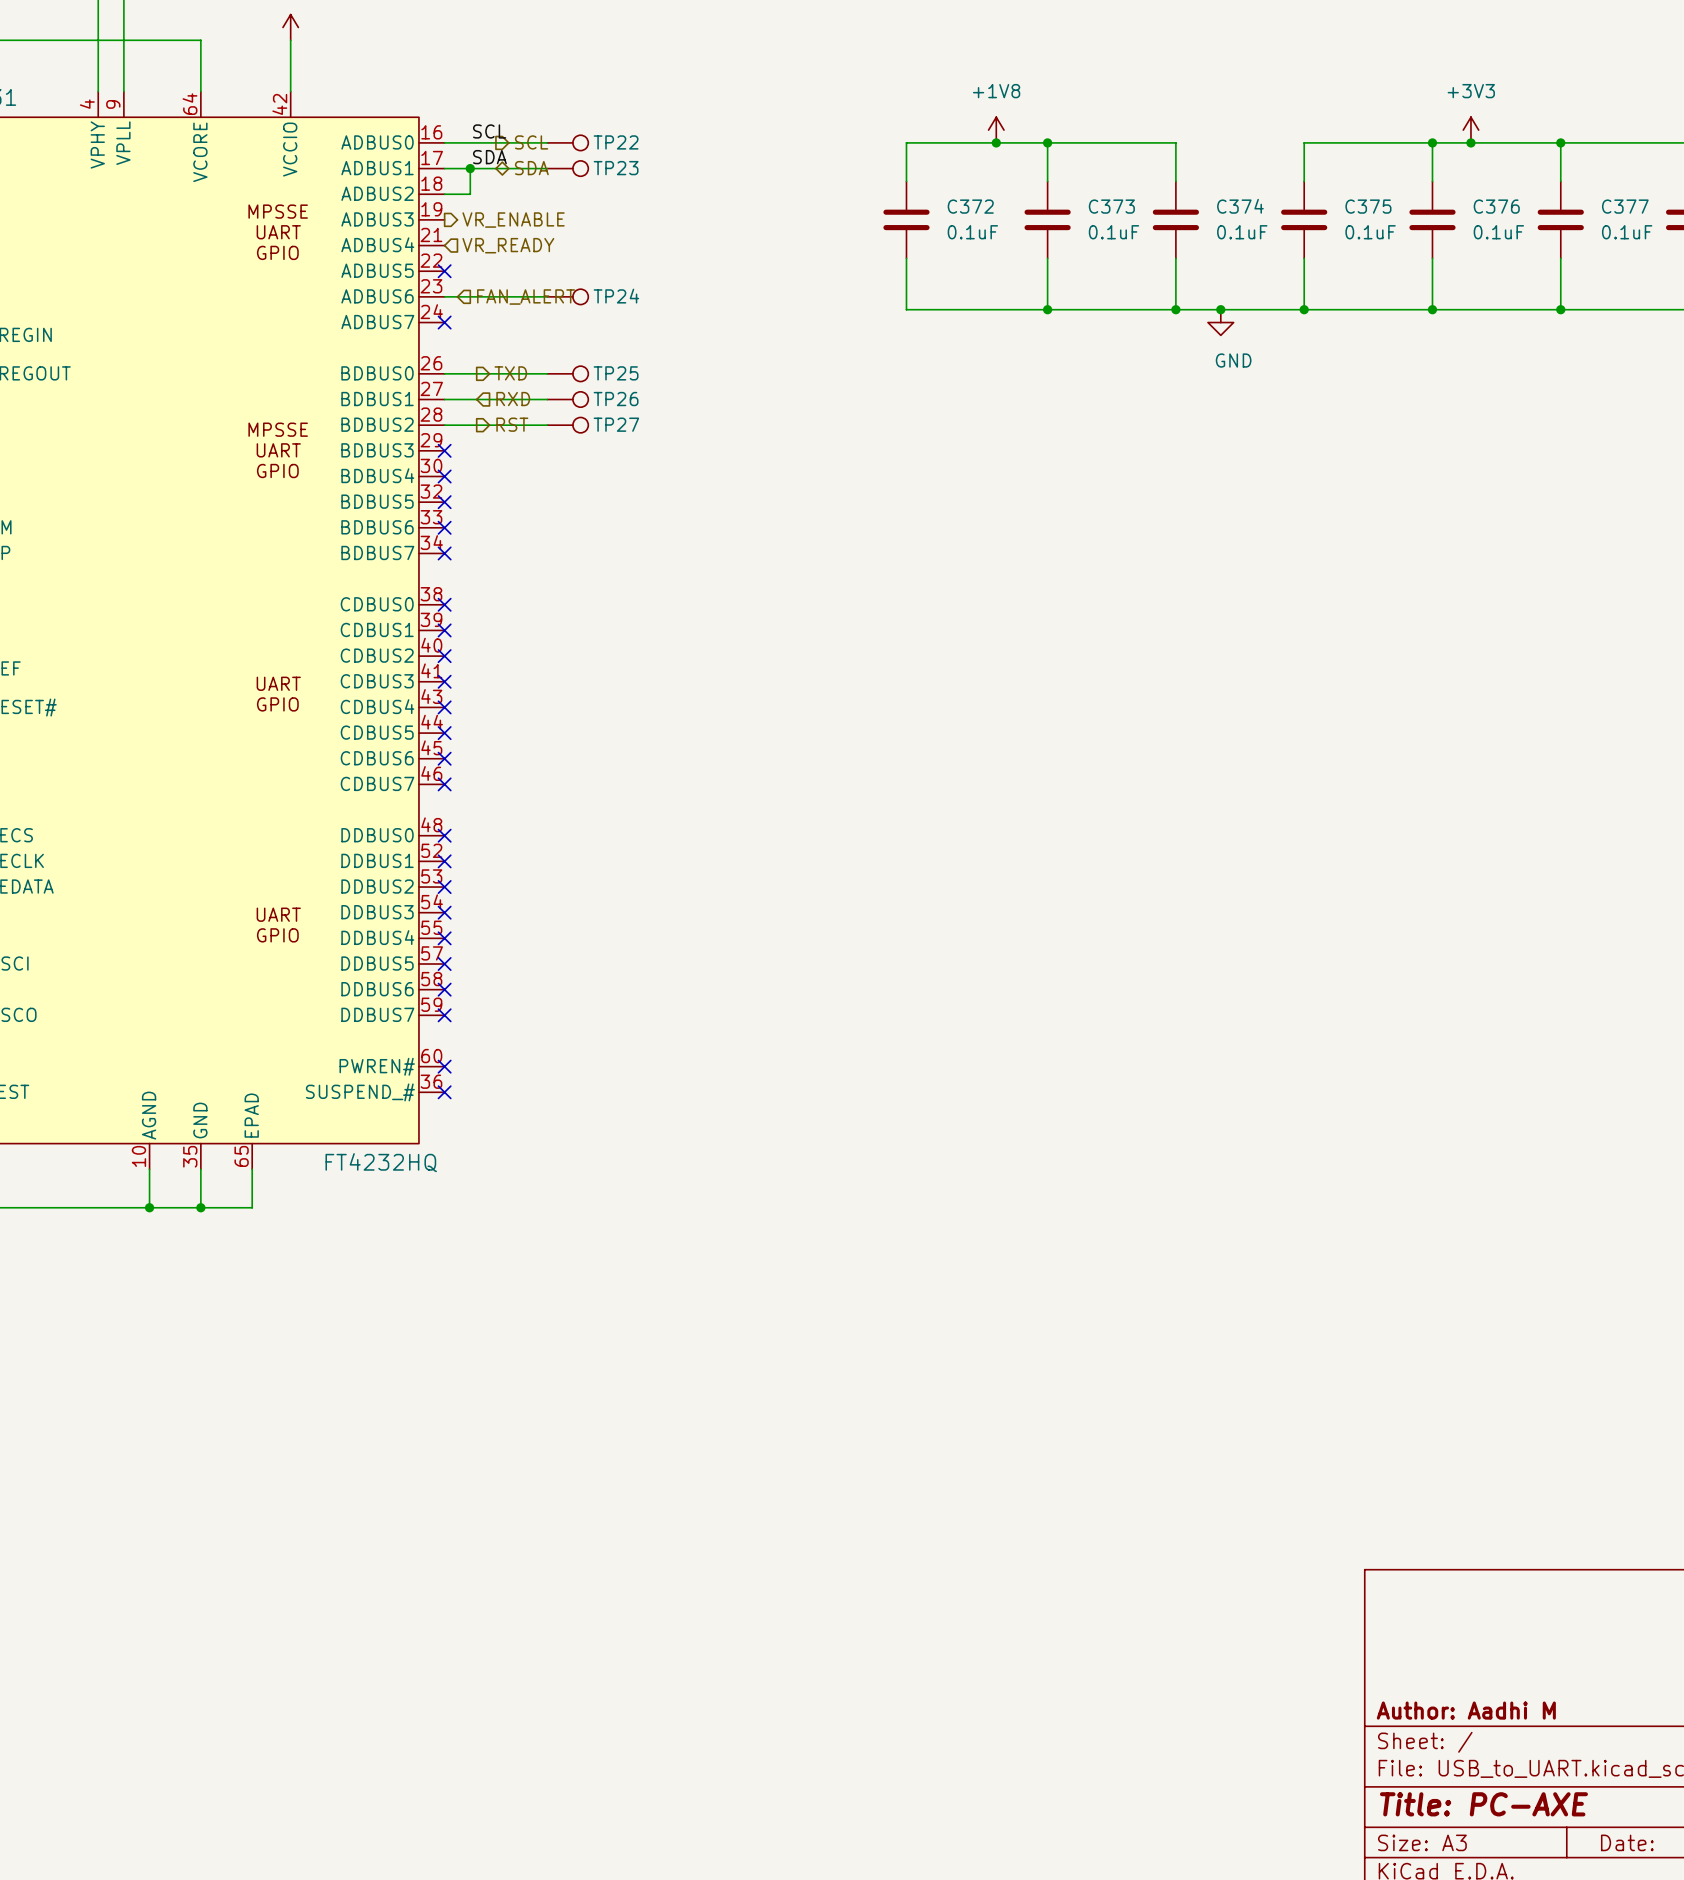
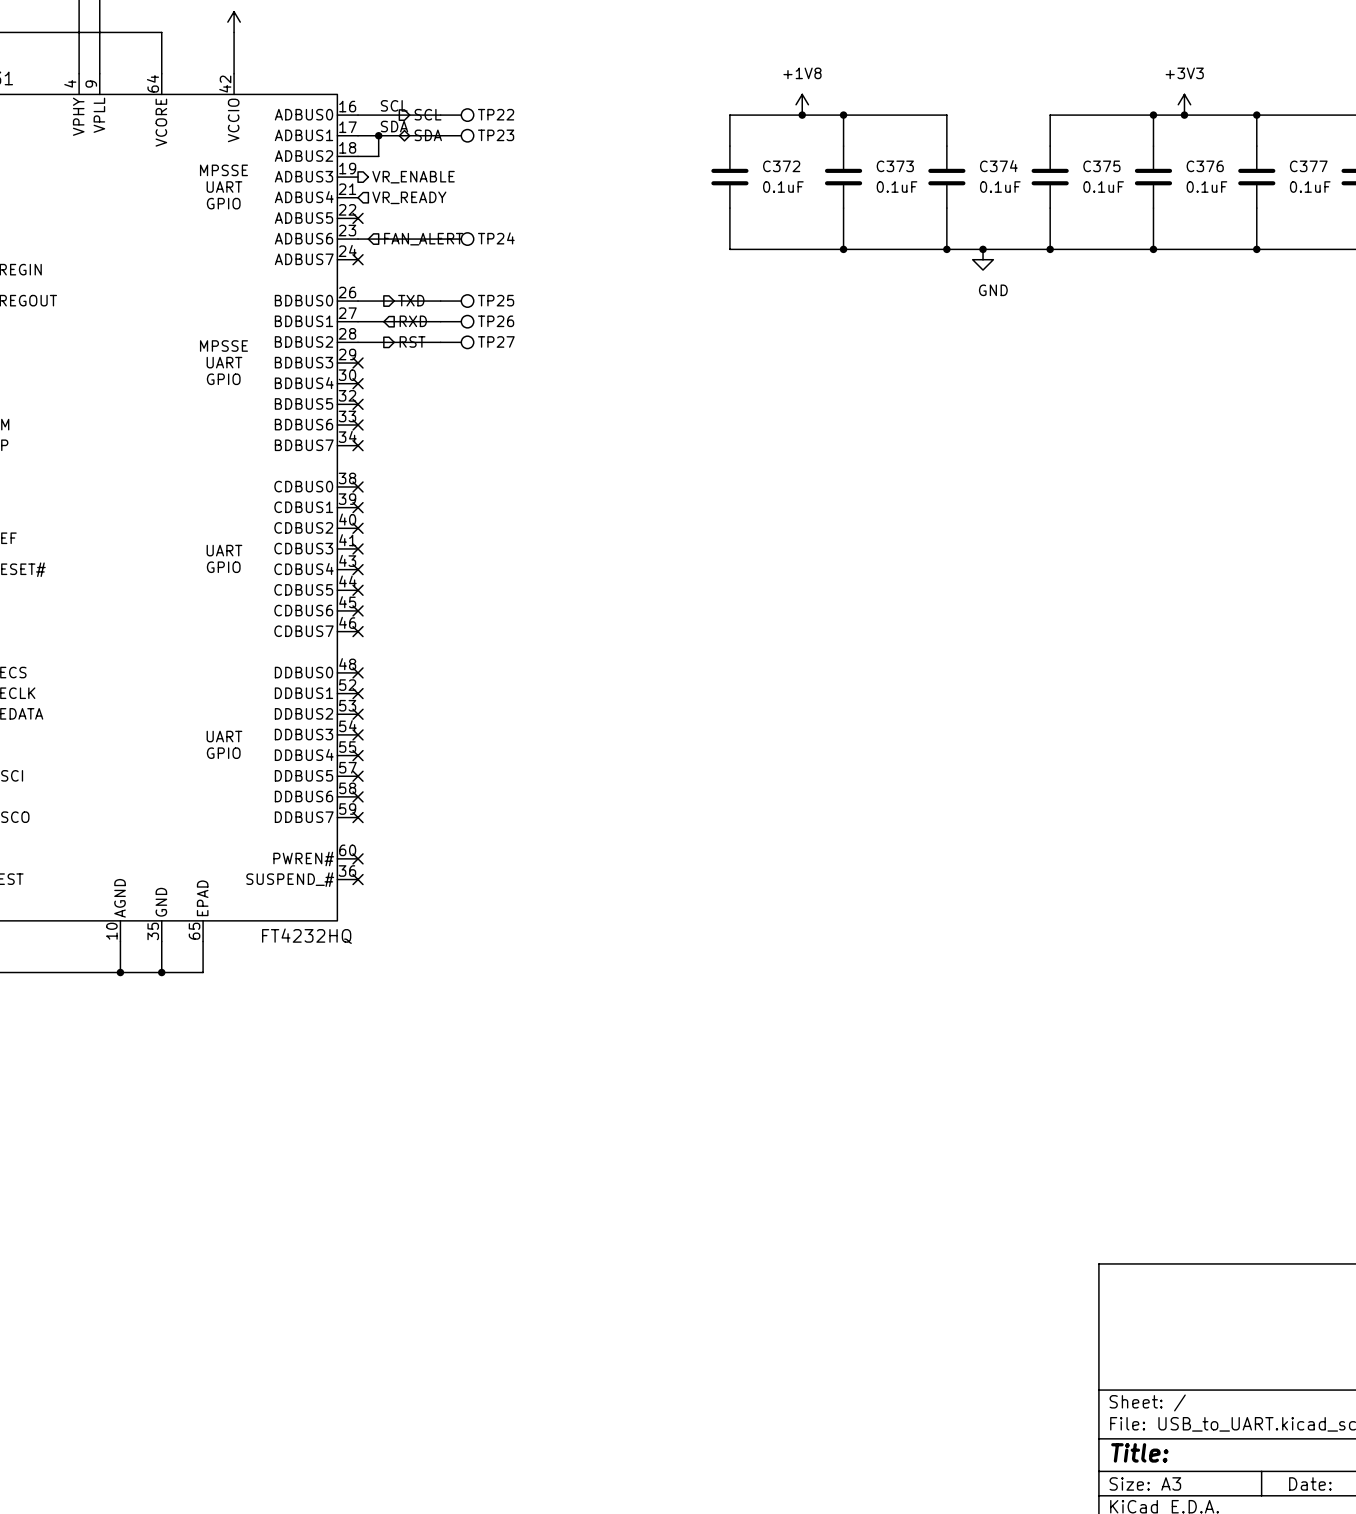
title block: Author: Aadhi M (1466, 1710) -> none
title block: Title: PC-AXE (1483, 1804) -> Title: (1139, 1452)

